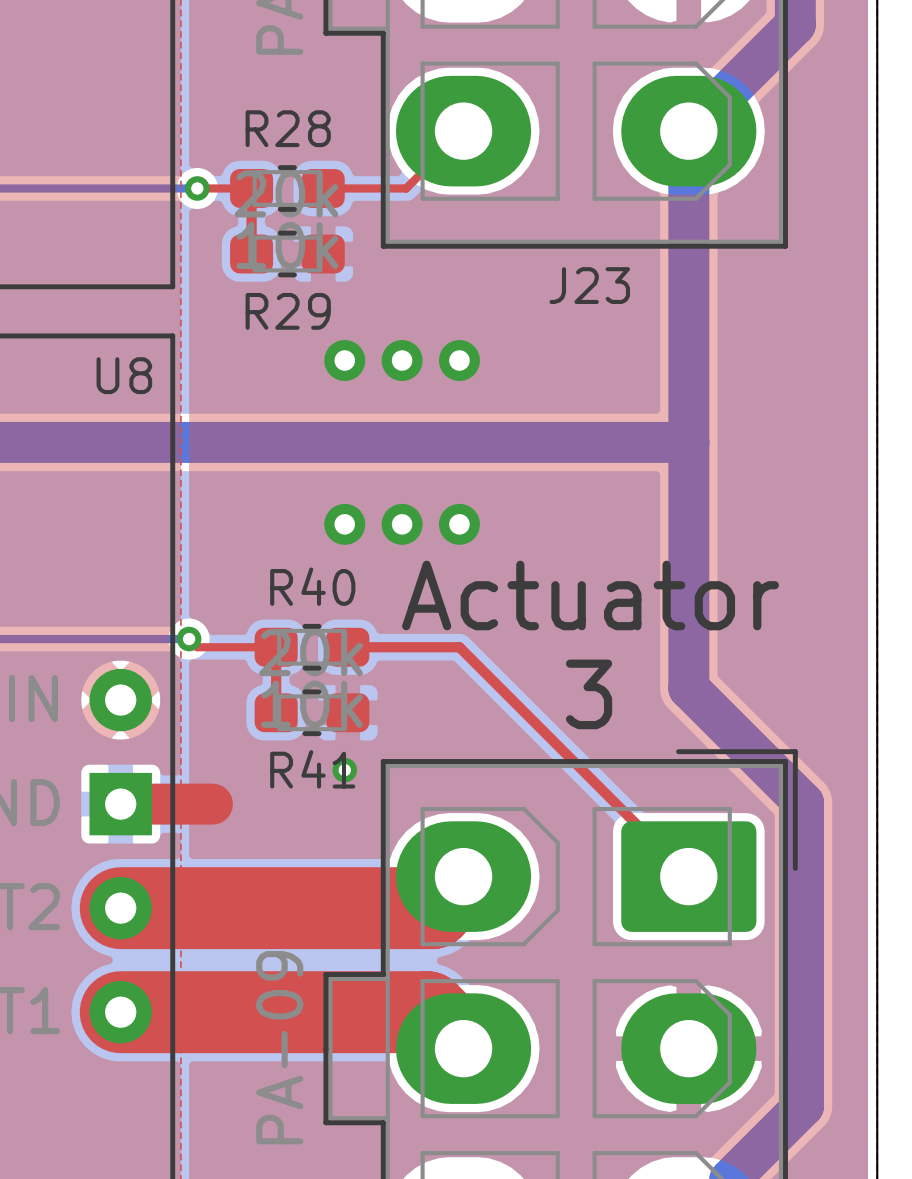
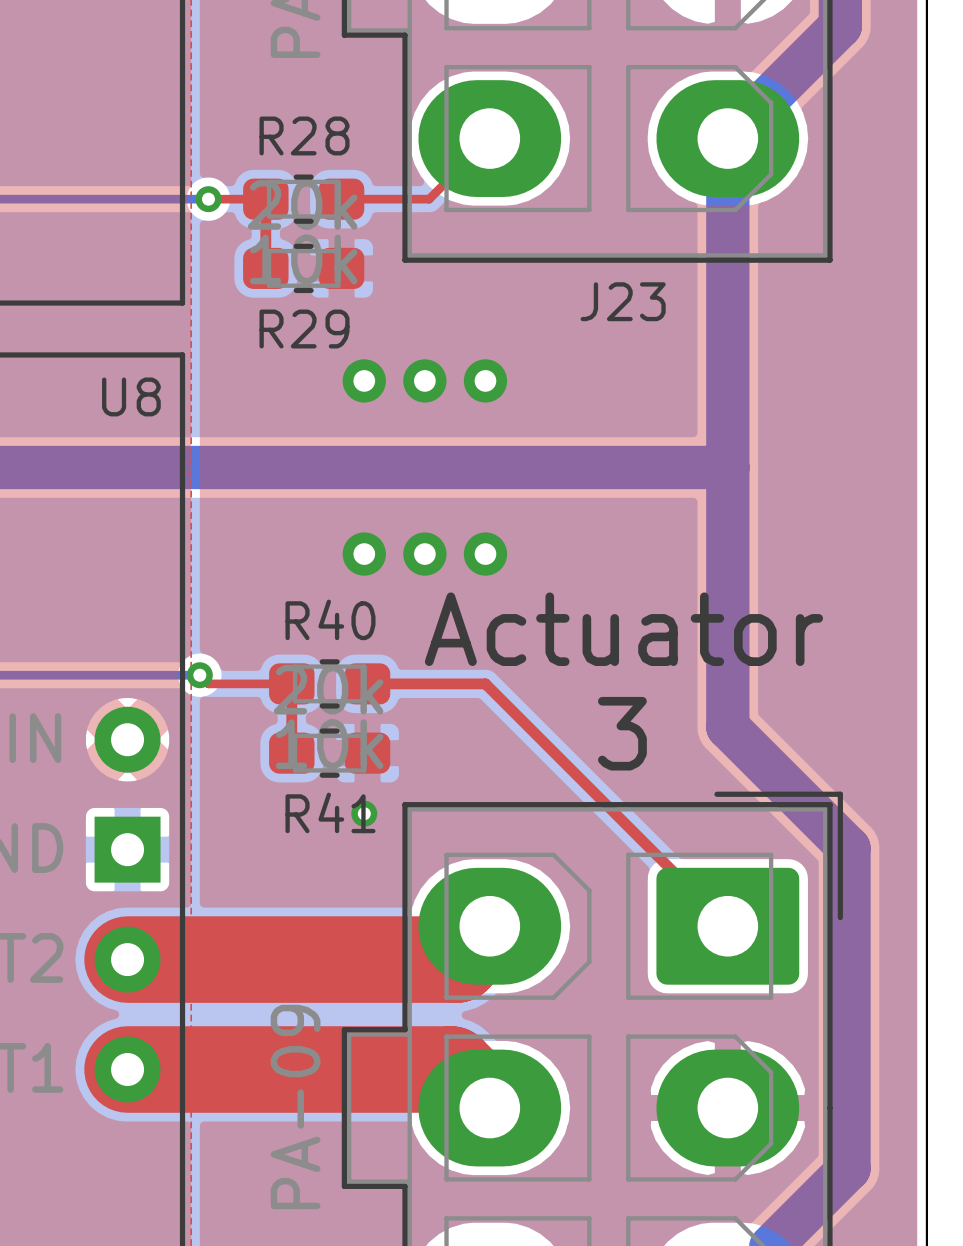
top track: (120, 804) (212, 804) -> none

